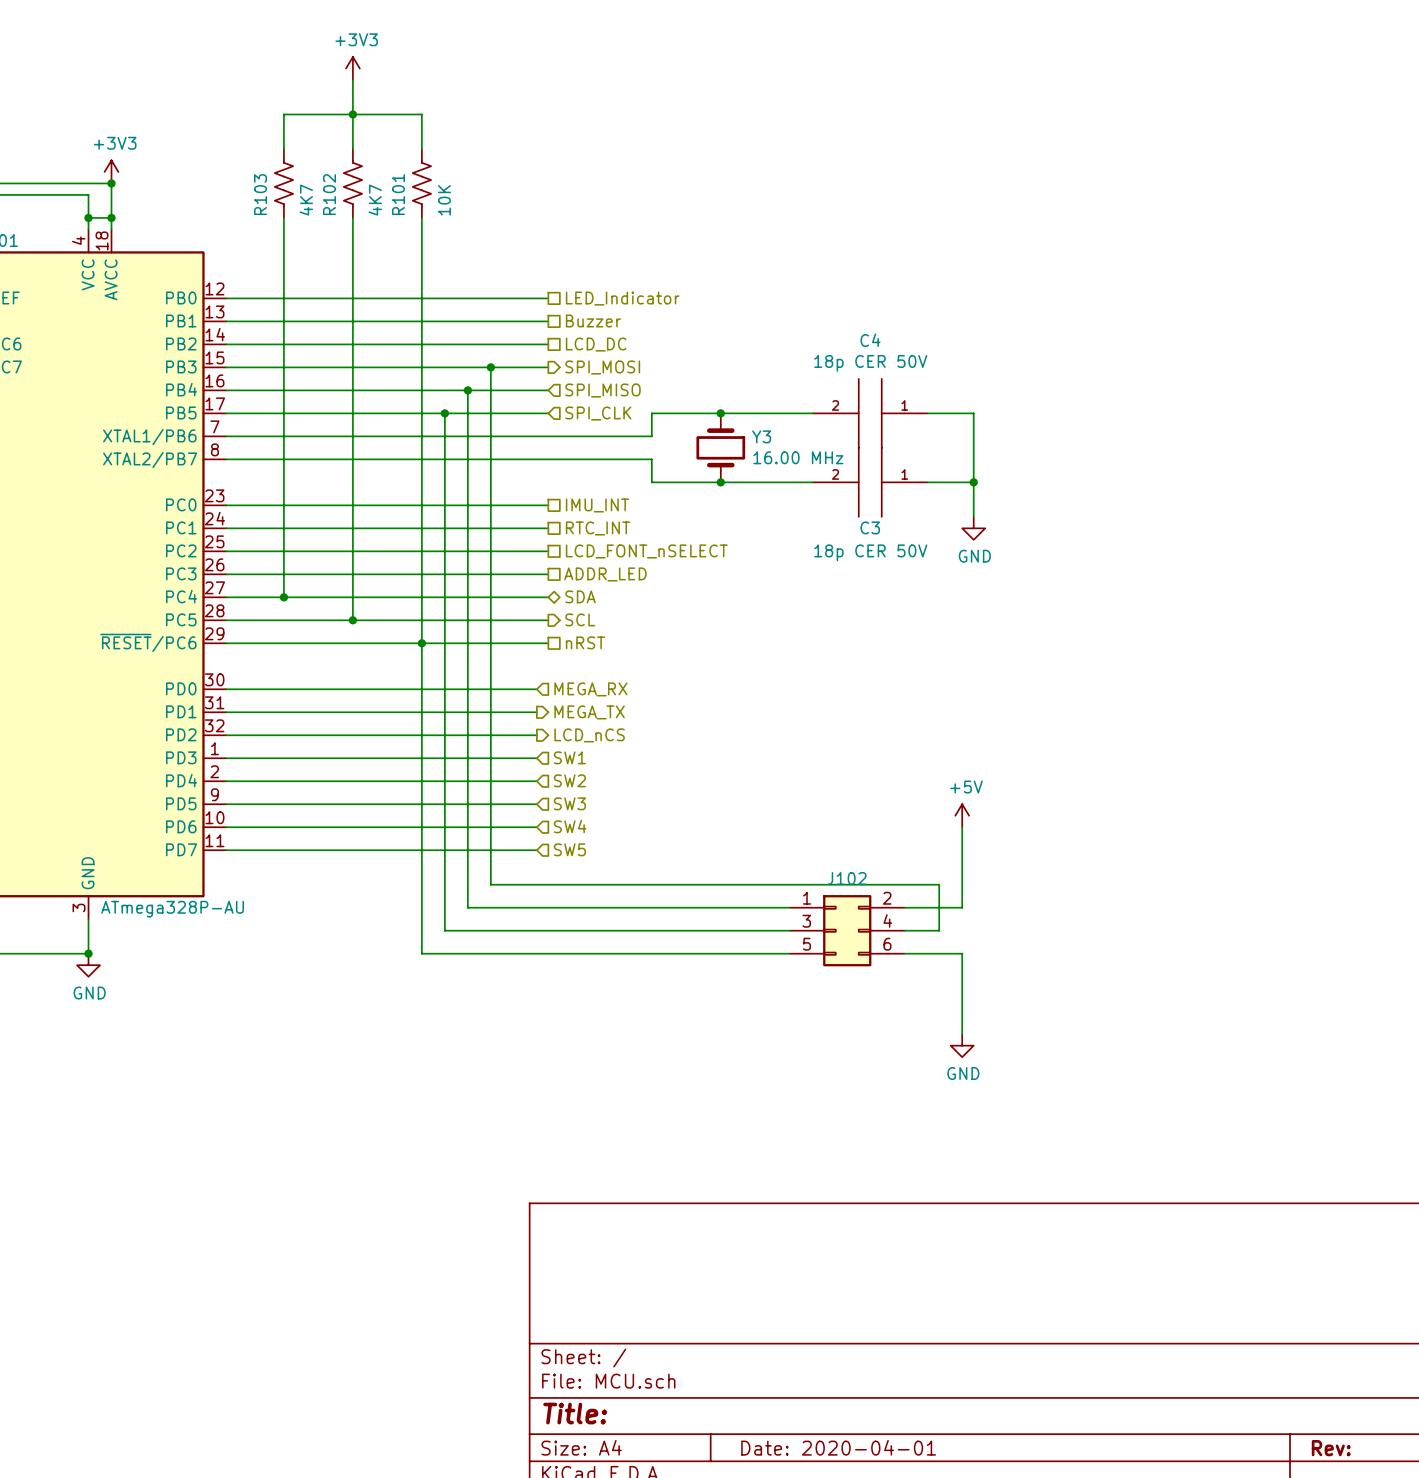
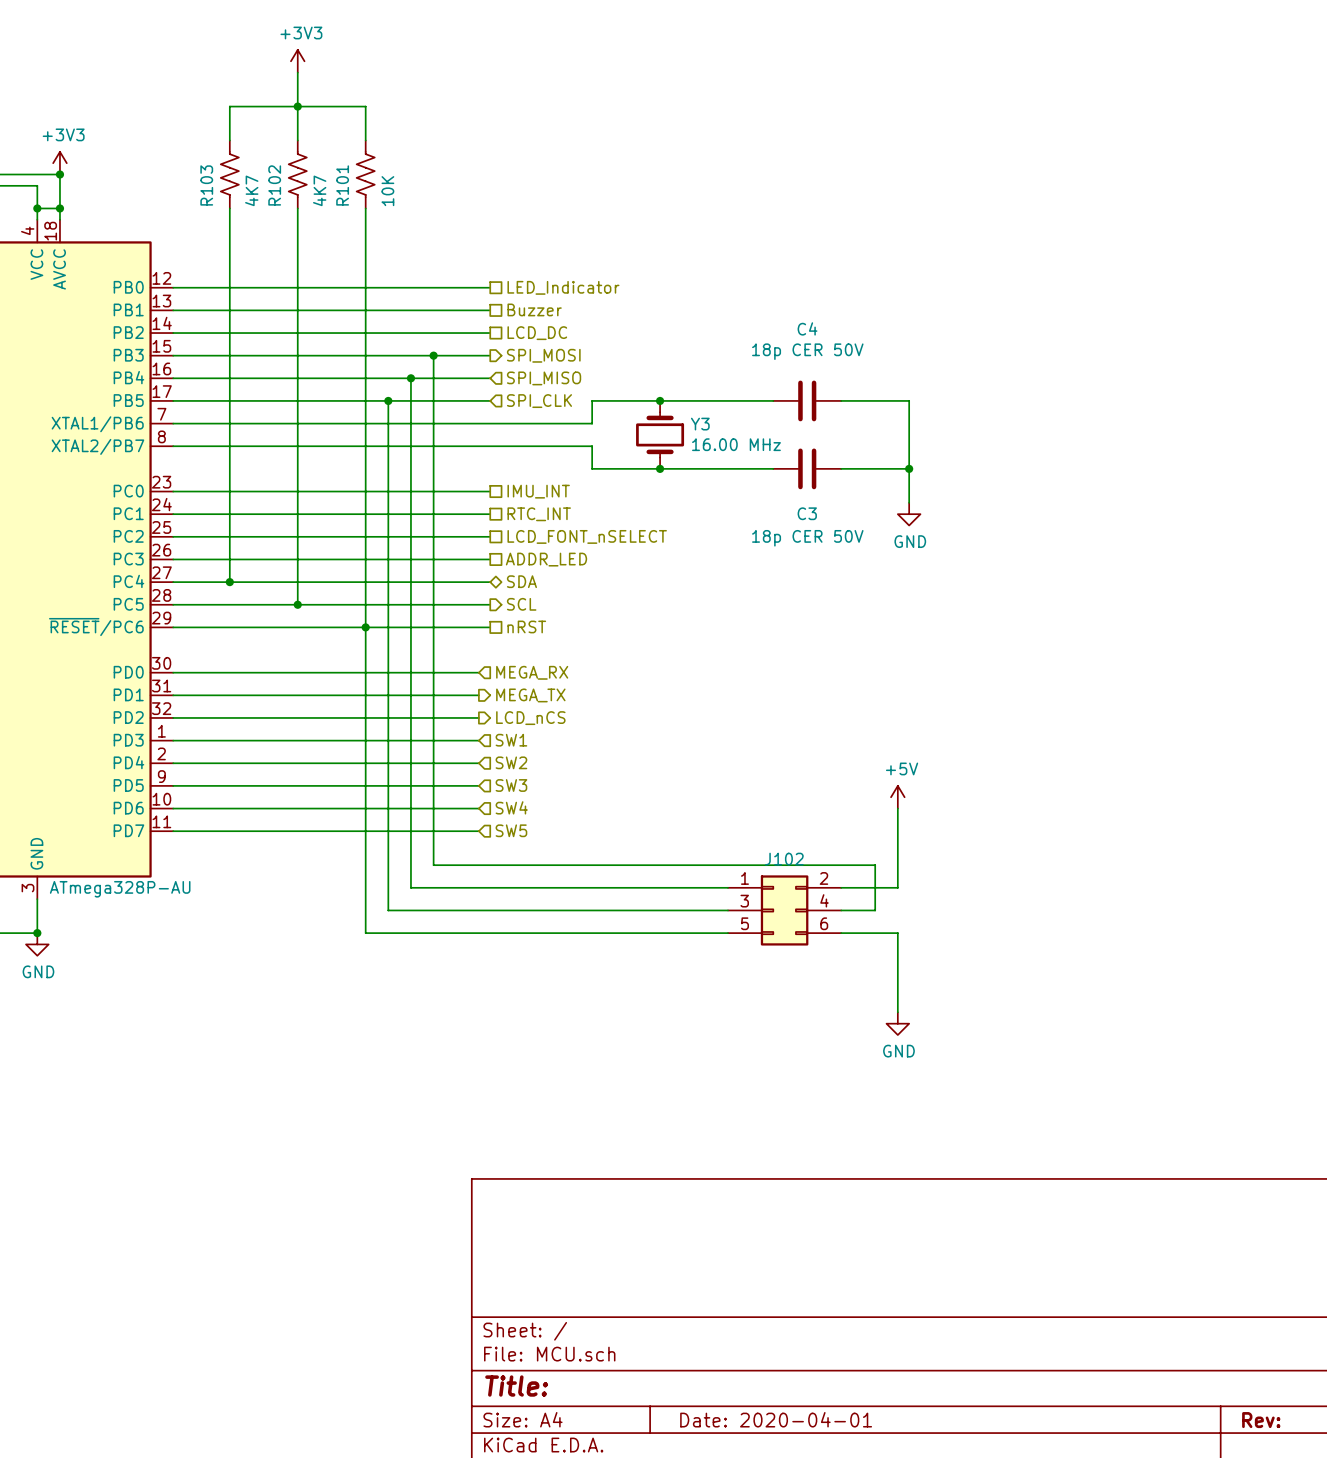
C4 symbol: [812, 378, 928, 448] -> [773, 380, 842, 422]
C3 symbol: [812, 447, 928, 517] -> [773, 448, 842, 490]

